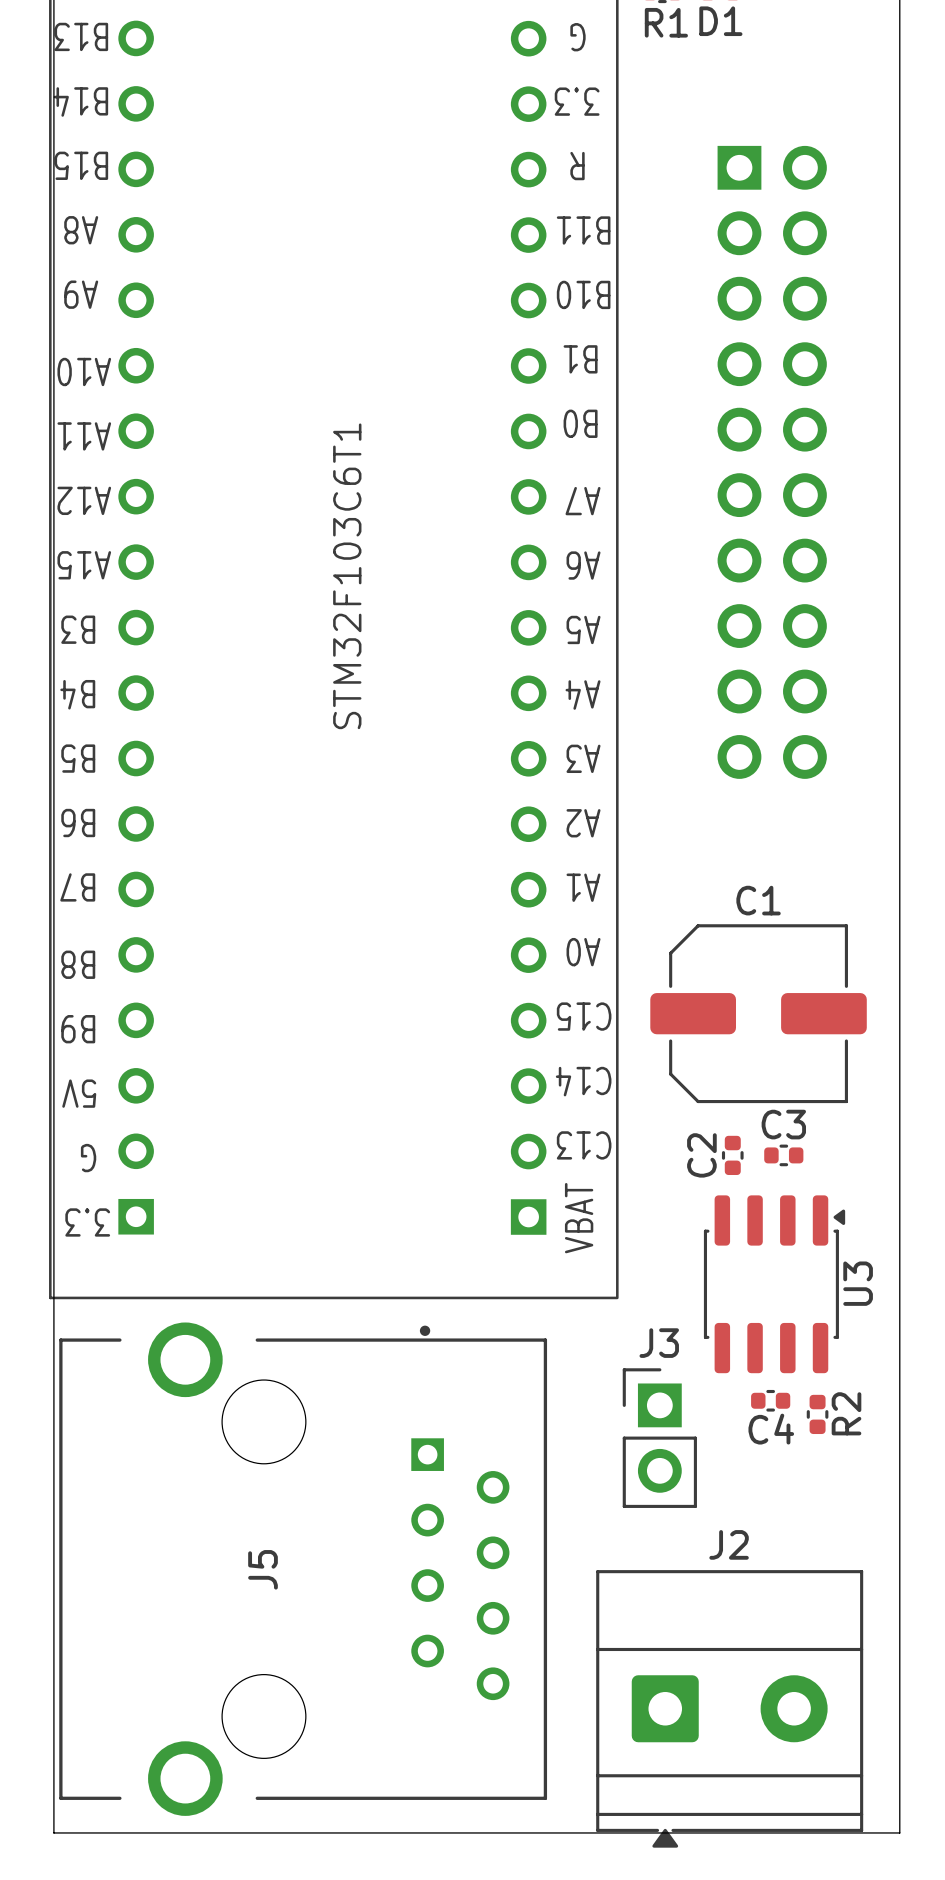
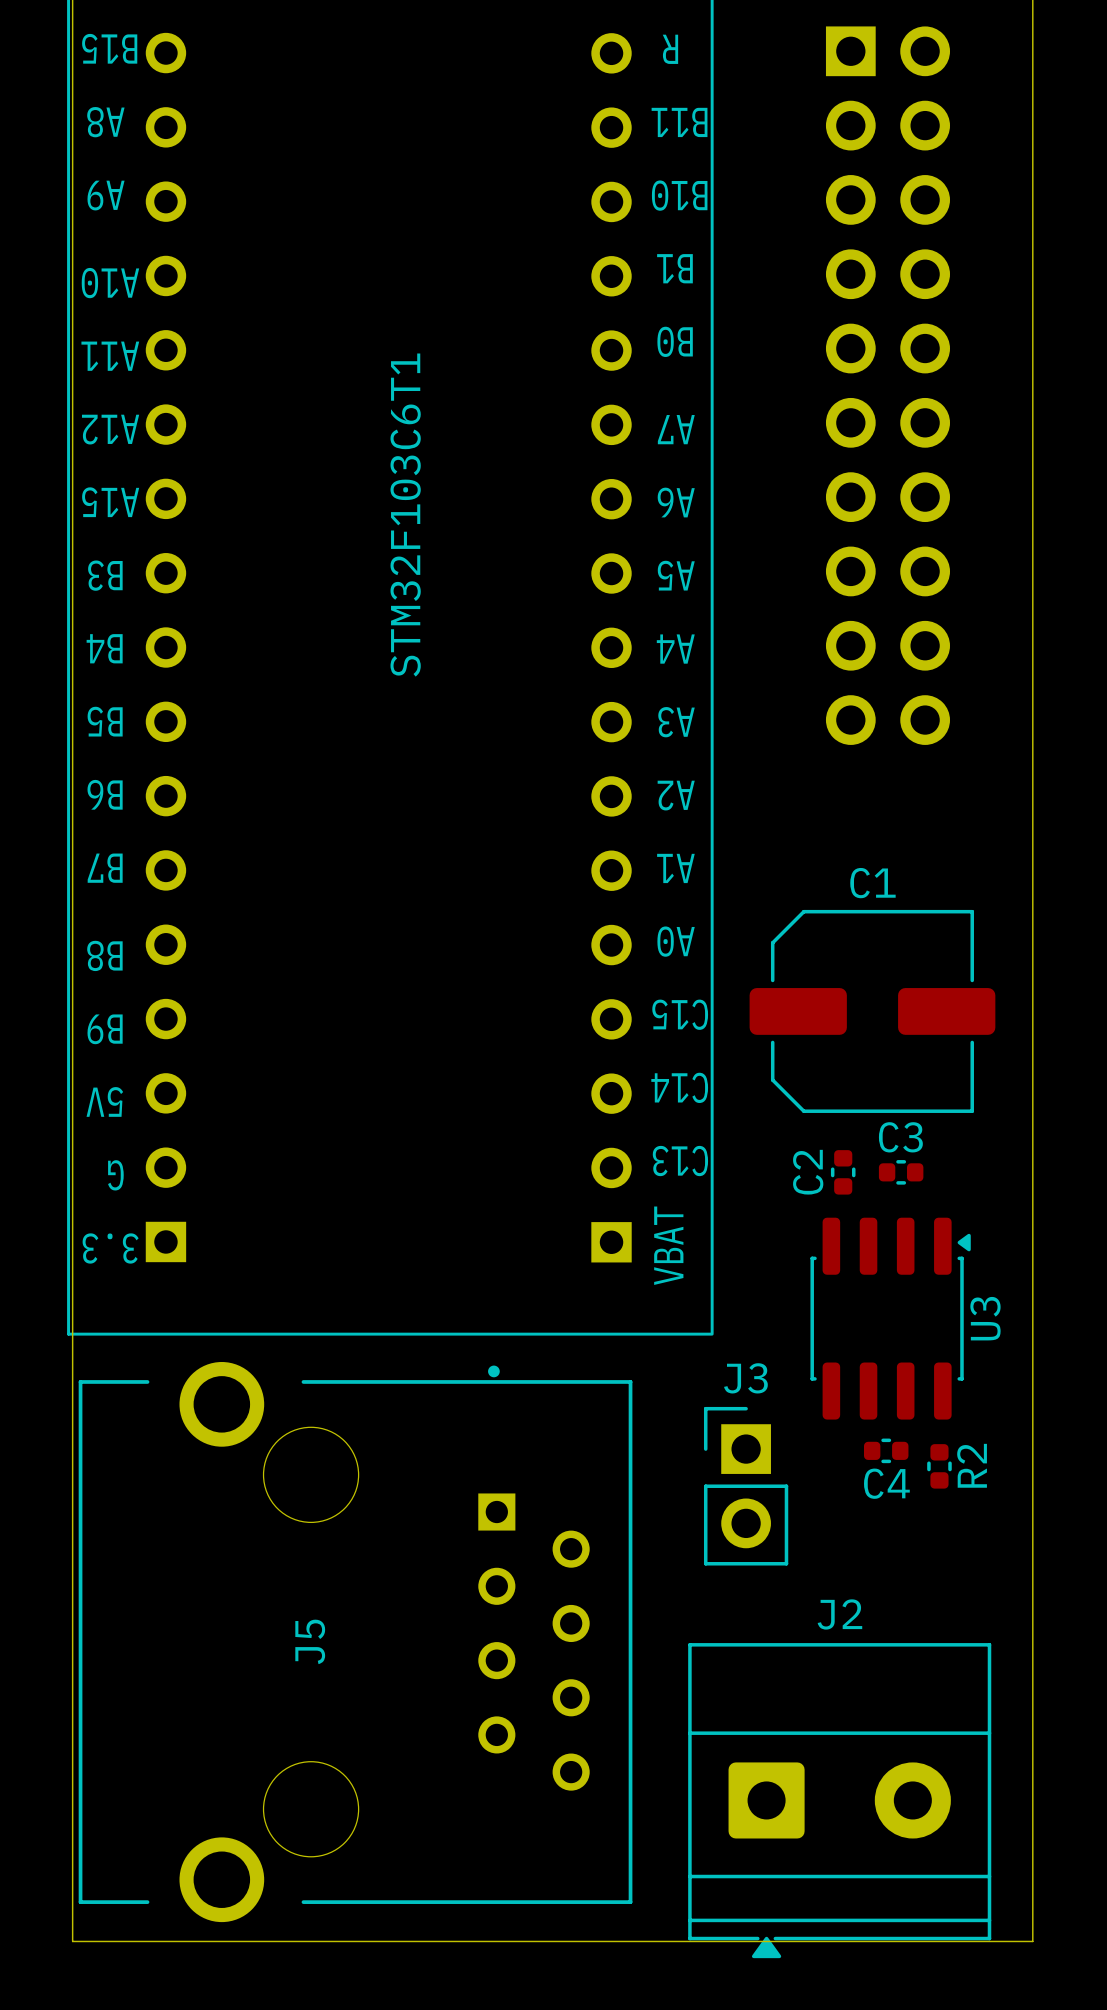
J3 position: (659, 1438) -> (746, 1486)

